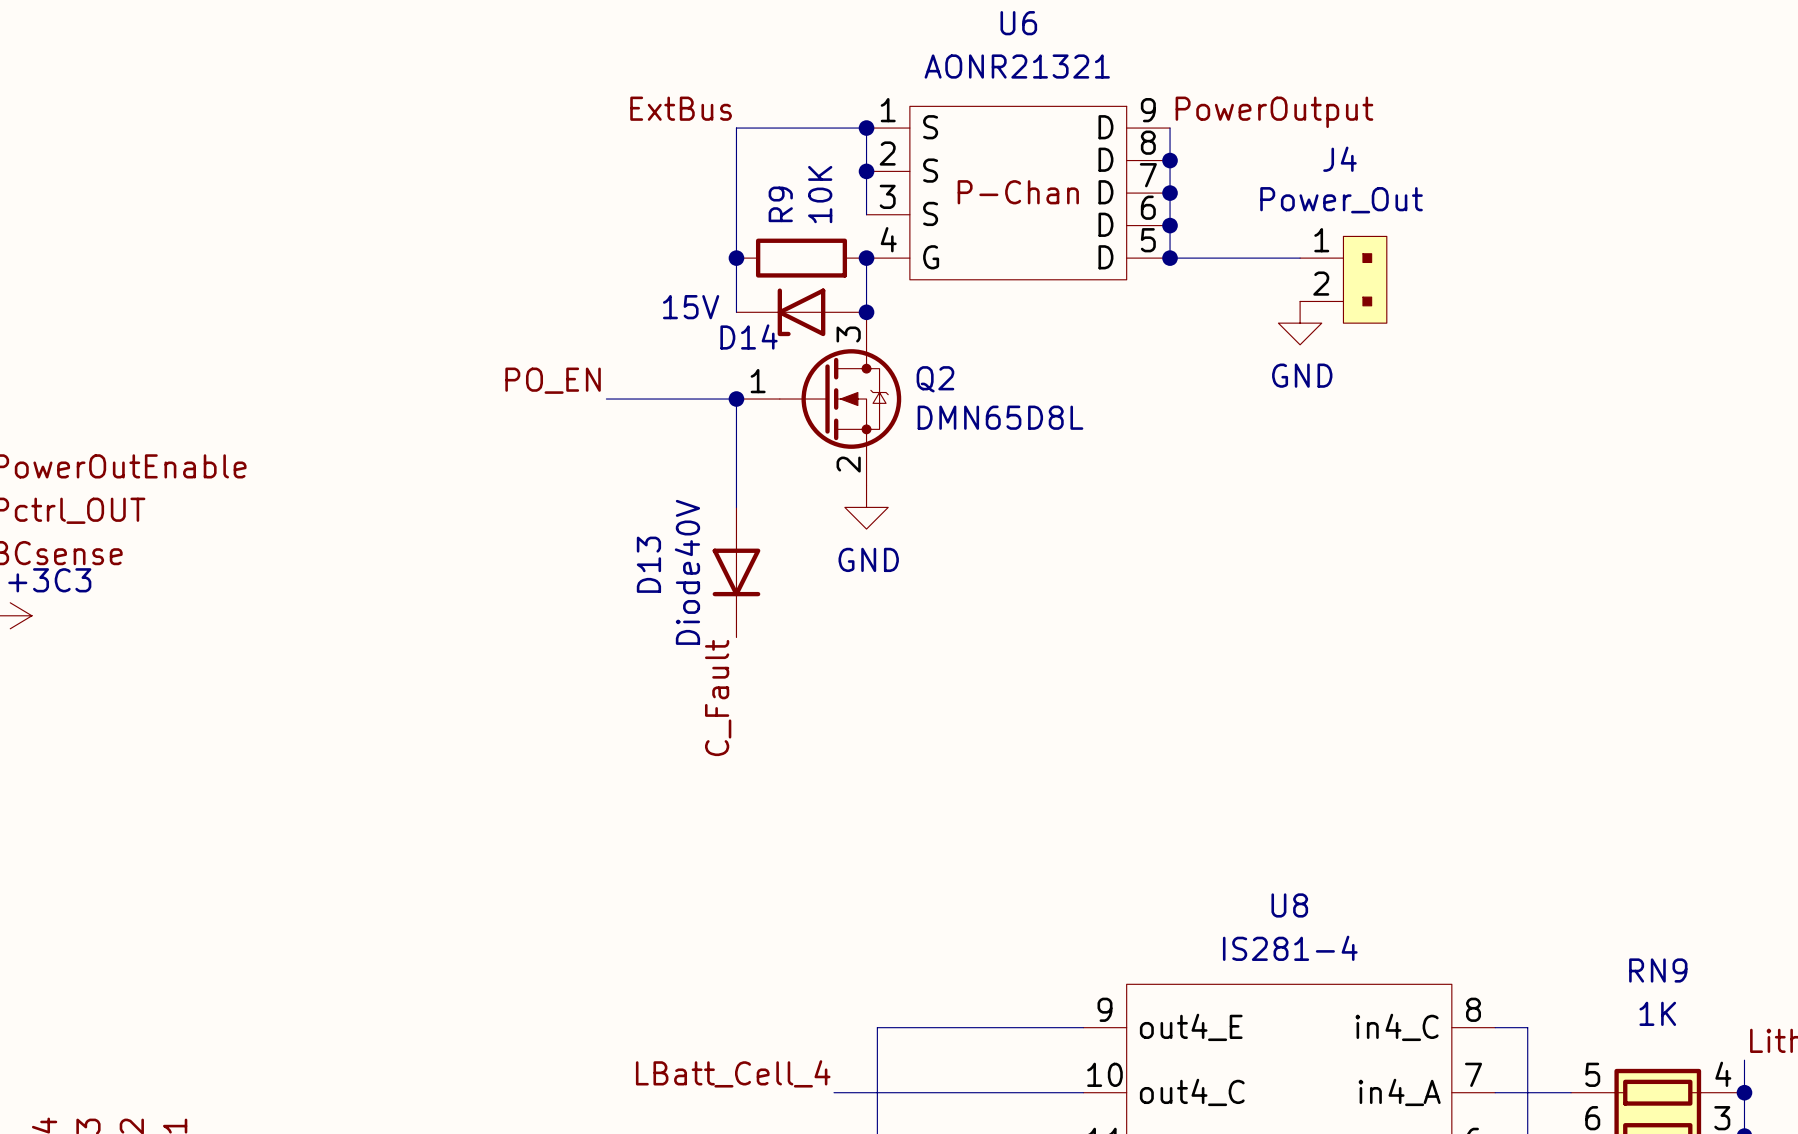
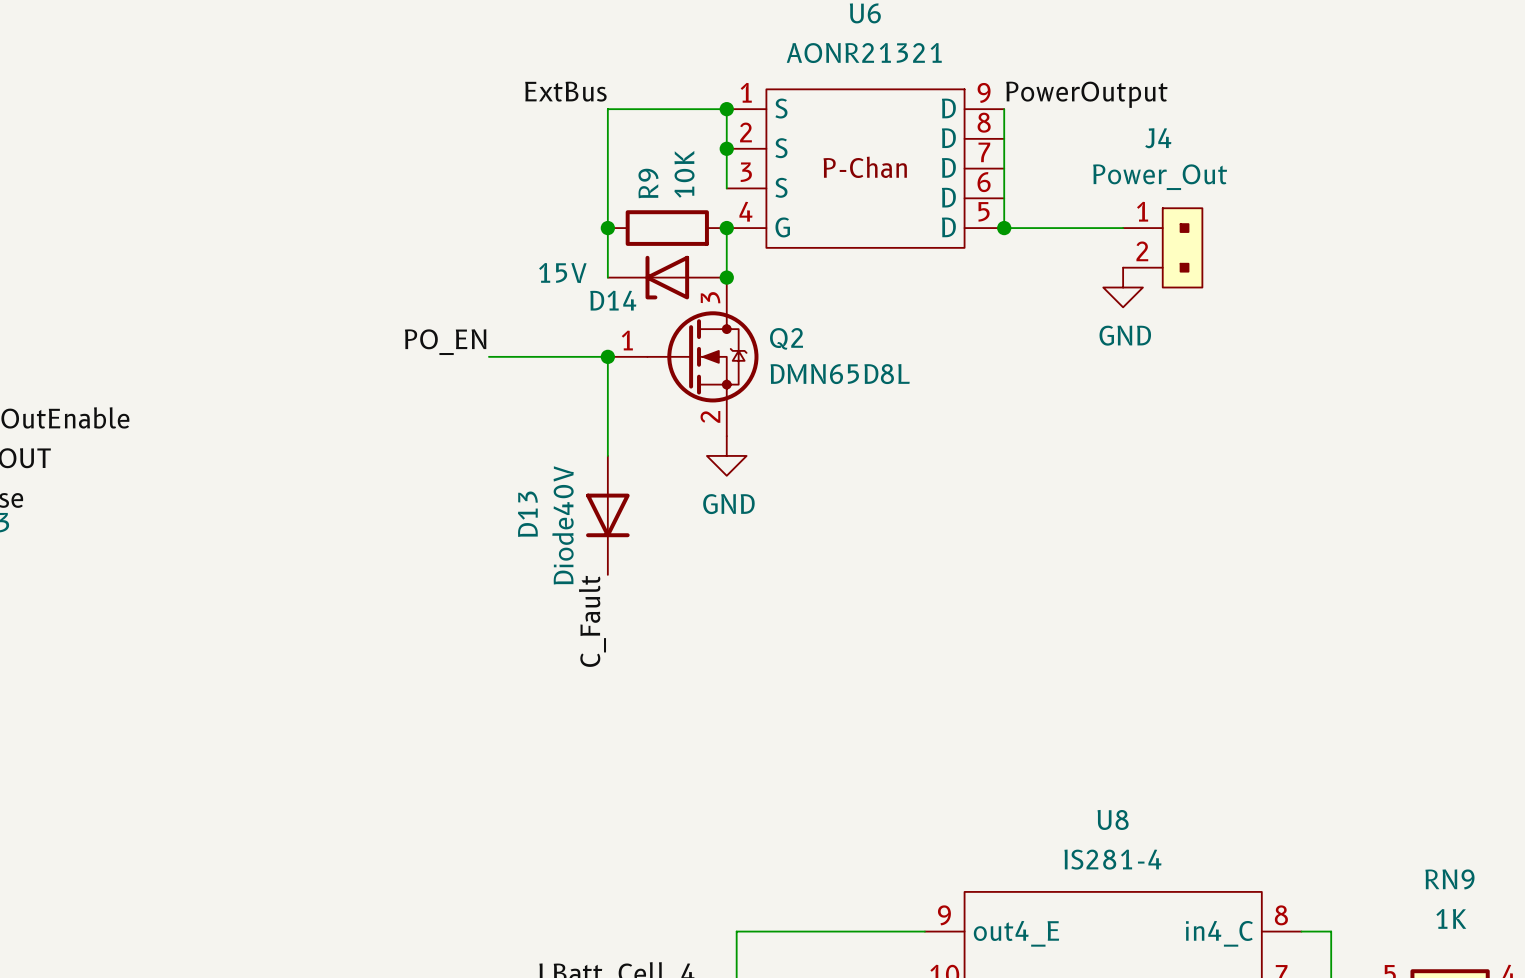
junction: (1170, 160) -> none
junction: (1170, 193) -> none
junction: (1170, 225) -> none

